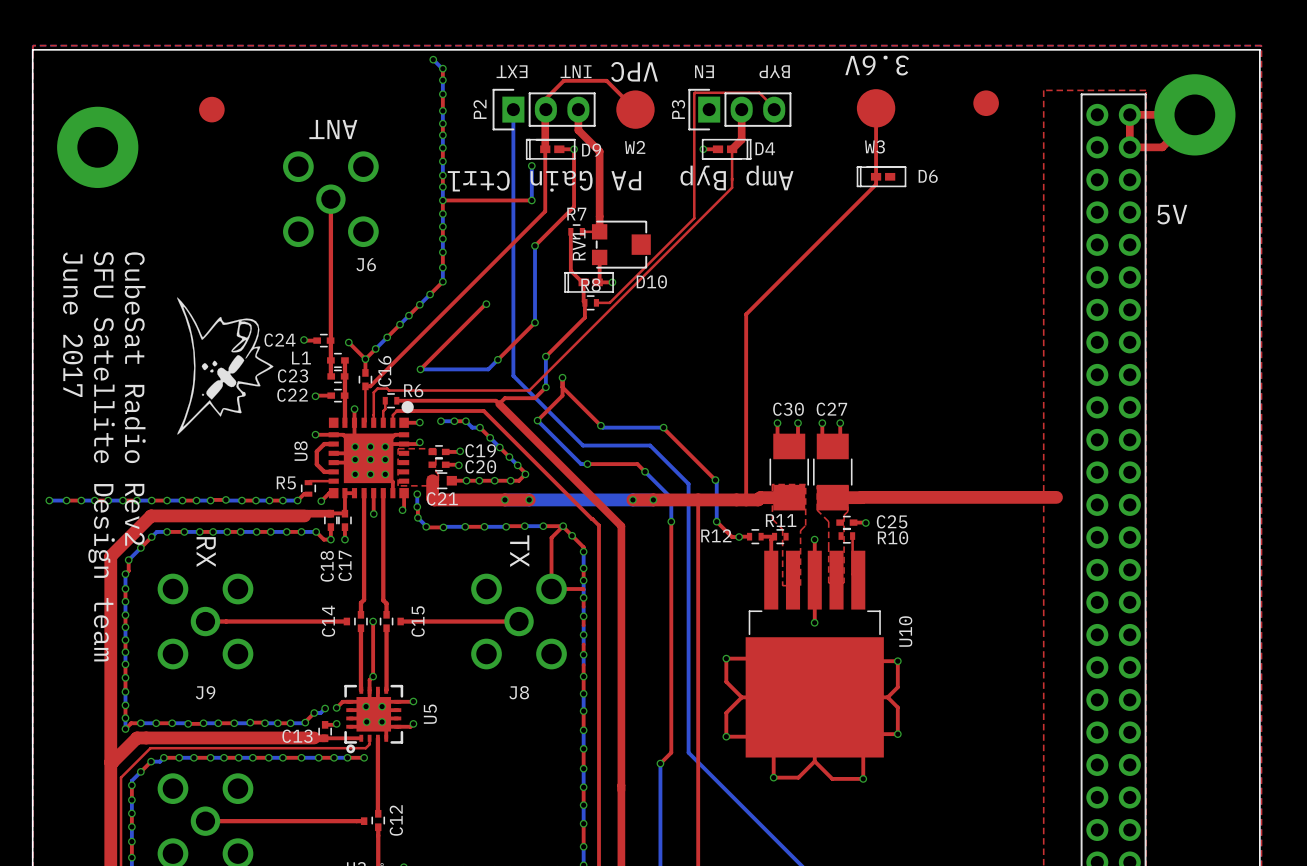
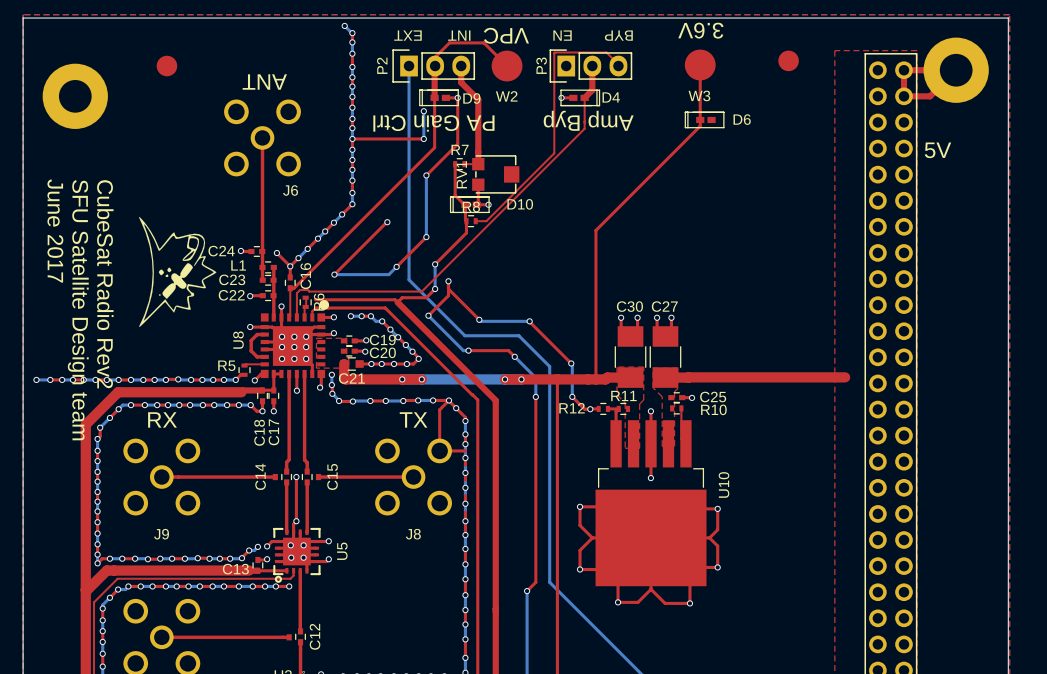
R6 rotation: 0° (391, 400) -> 90° clockwise (305, 302)
text rotation: 0° (519, 551) -> 90° counterclockwise (413, 419)
text rotation: 0° (206, 552) -> 90° counterclockwise (162, 419)

